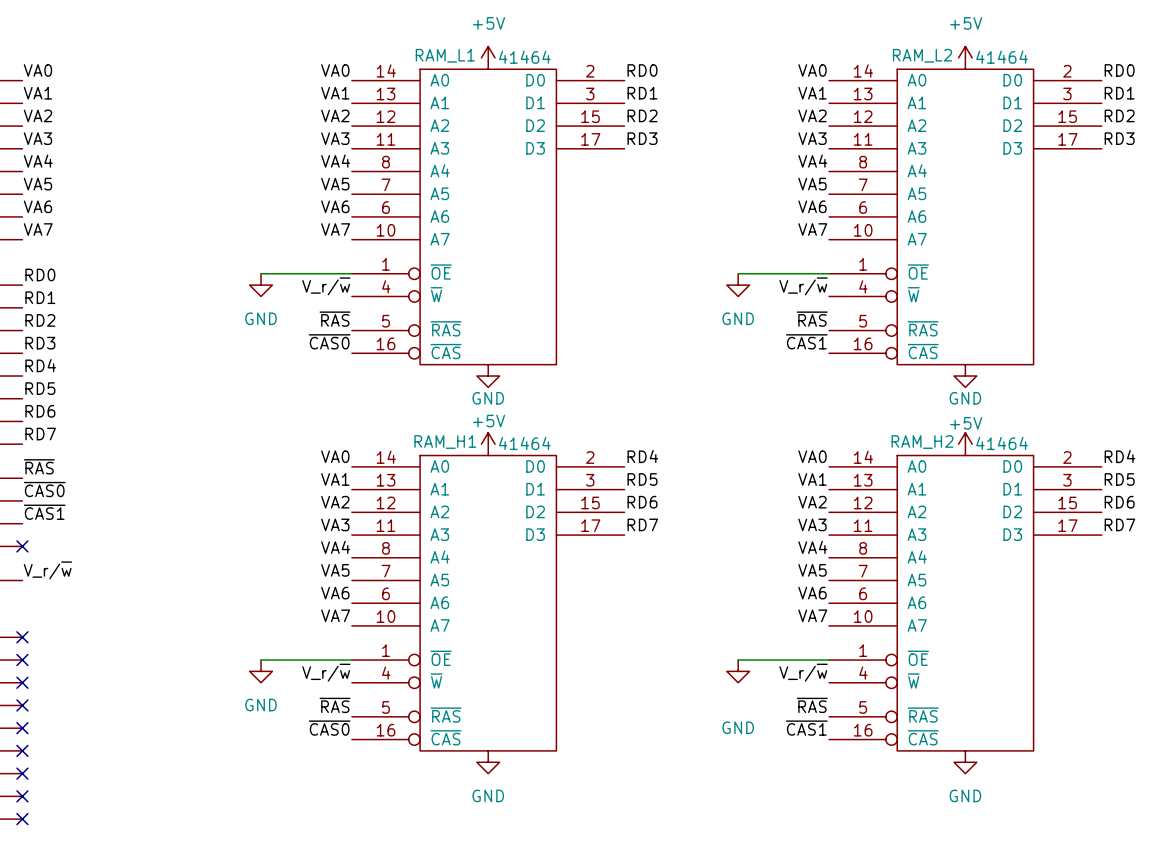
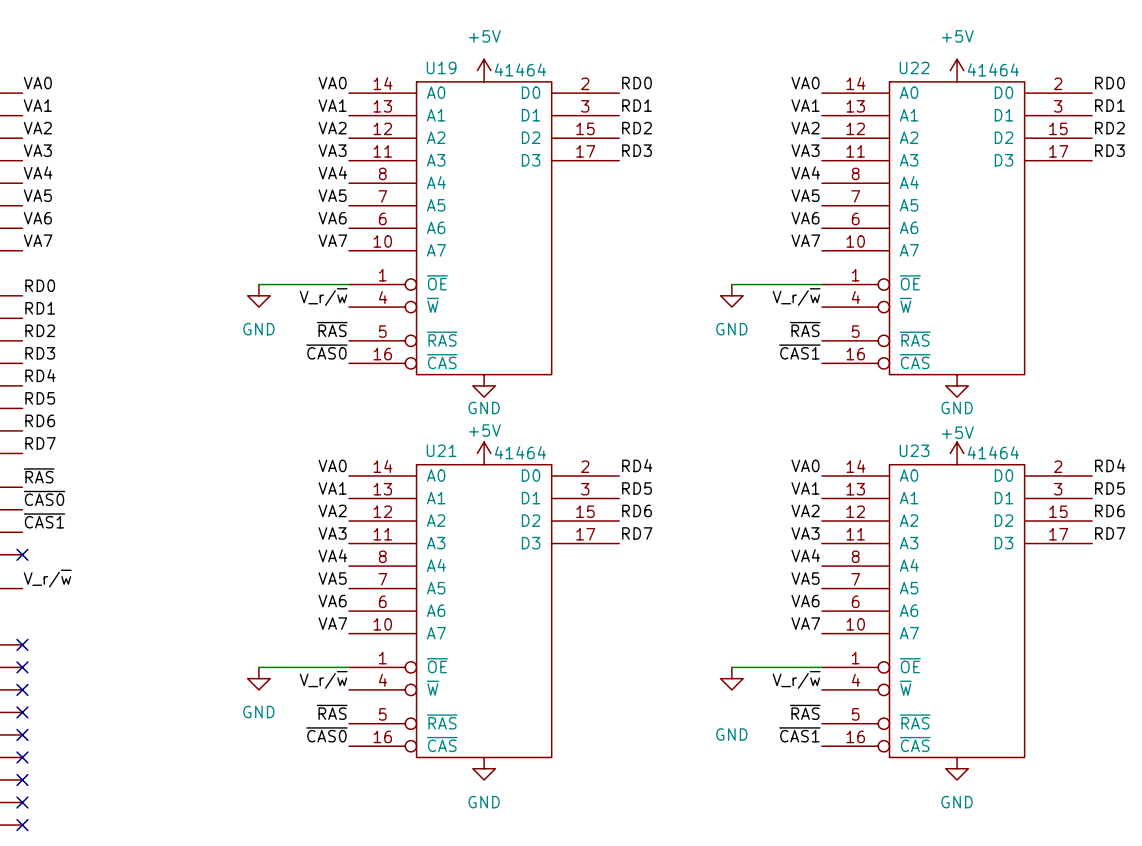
RAM_L1 name: RAM_L1 (445, 55) -> U19 (441, 67)
RAM_L2 name: RAM_L2 (922, 55) -> U22 (914, 67)
RAM_H1 name: RAM_H1 (445, 442) -> U21 (441, 450)
RAM_H2 name: RAM_H2 (922, 442) -> U23 (914, 450)

